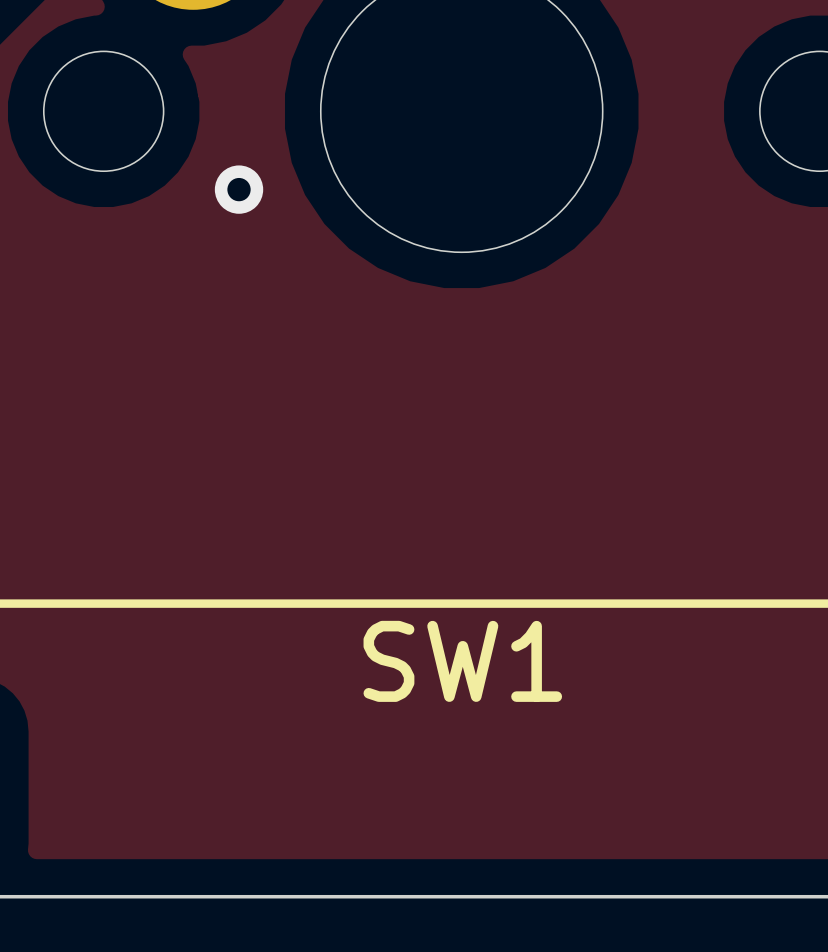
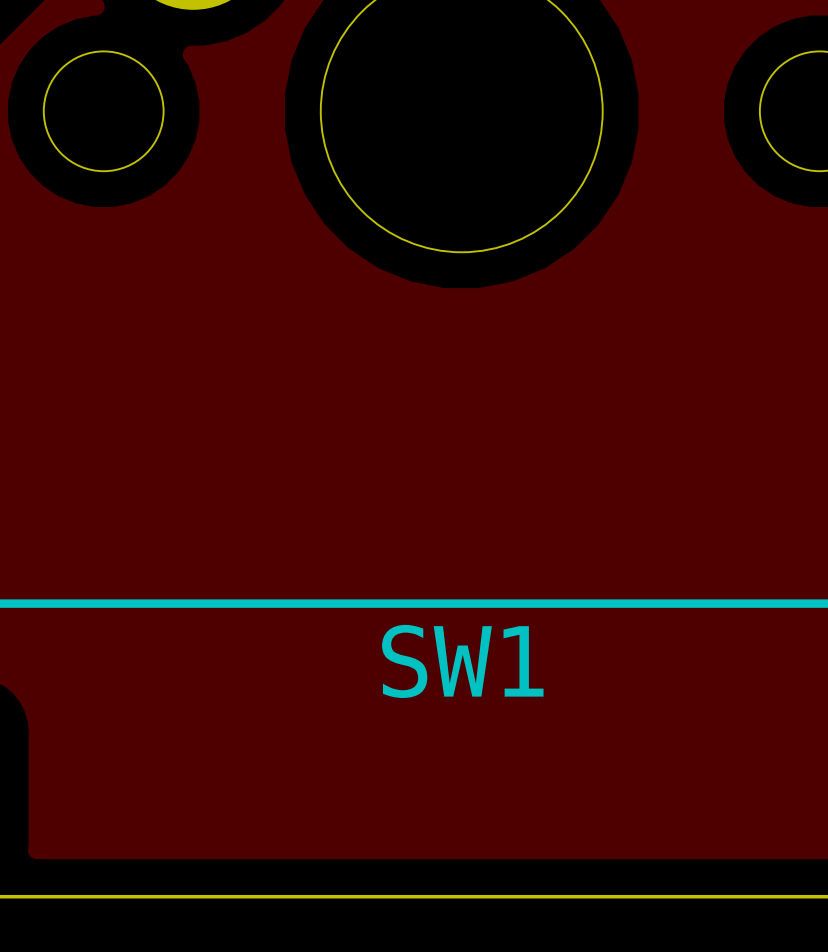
via: (239, 189) -> none

